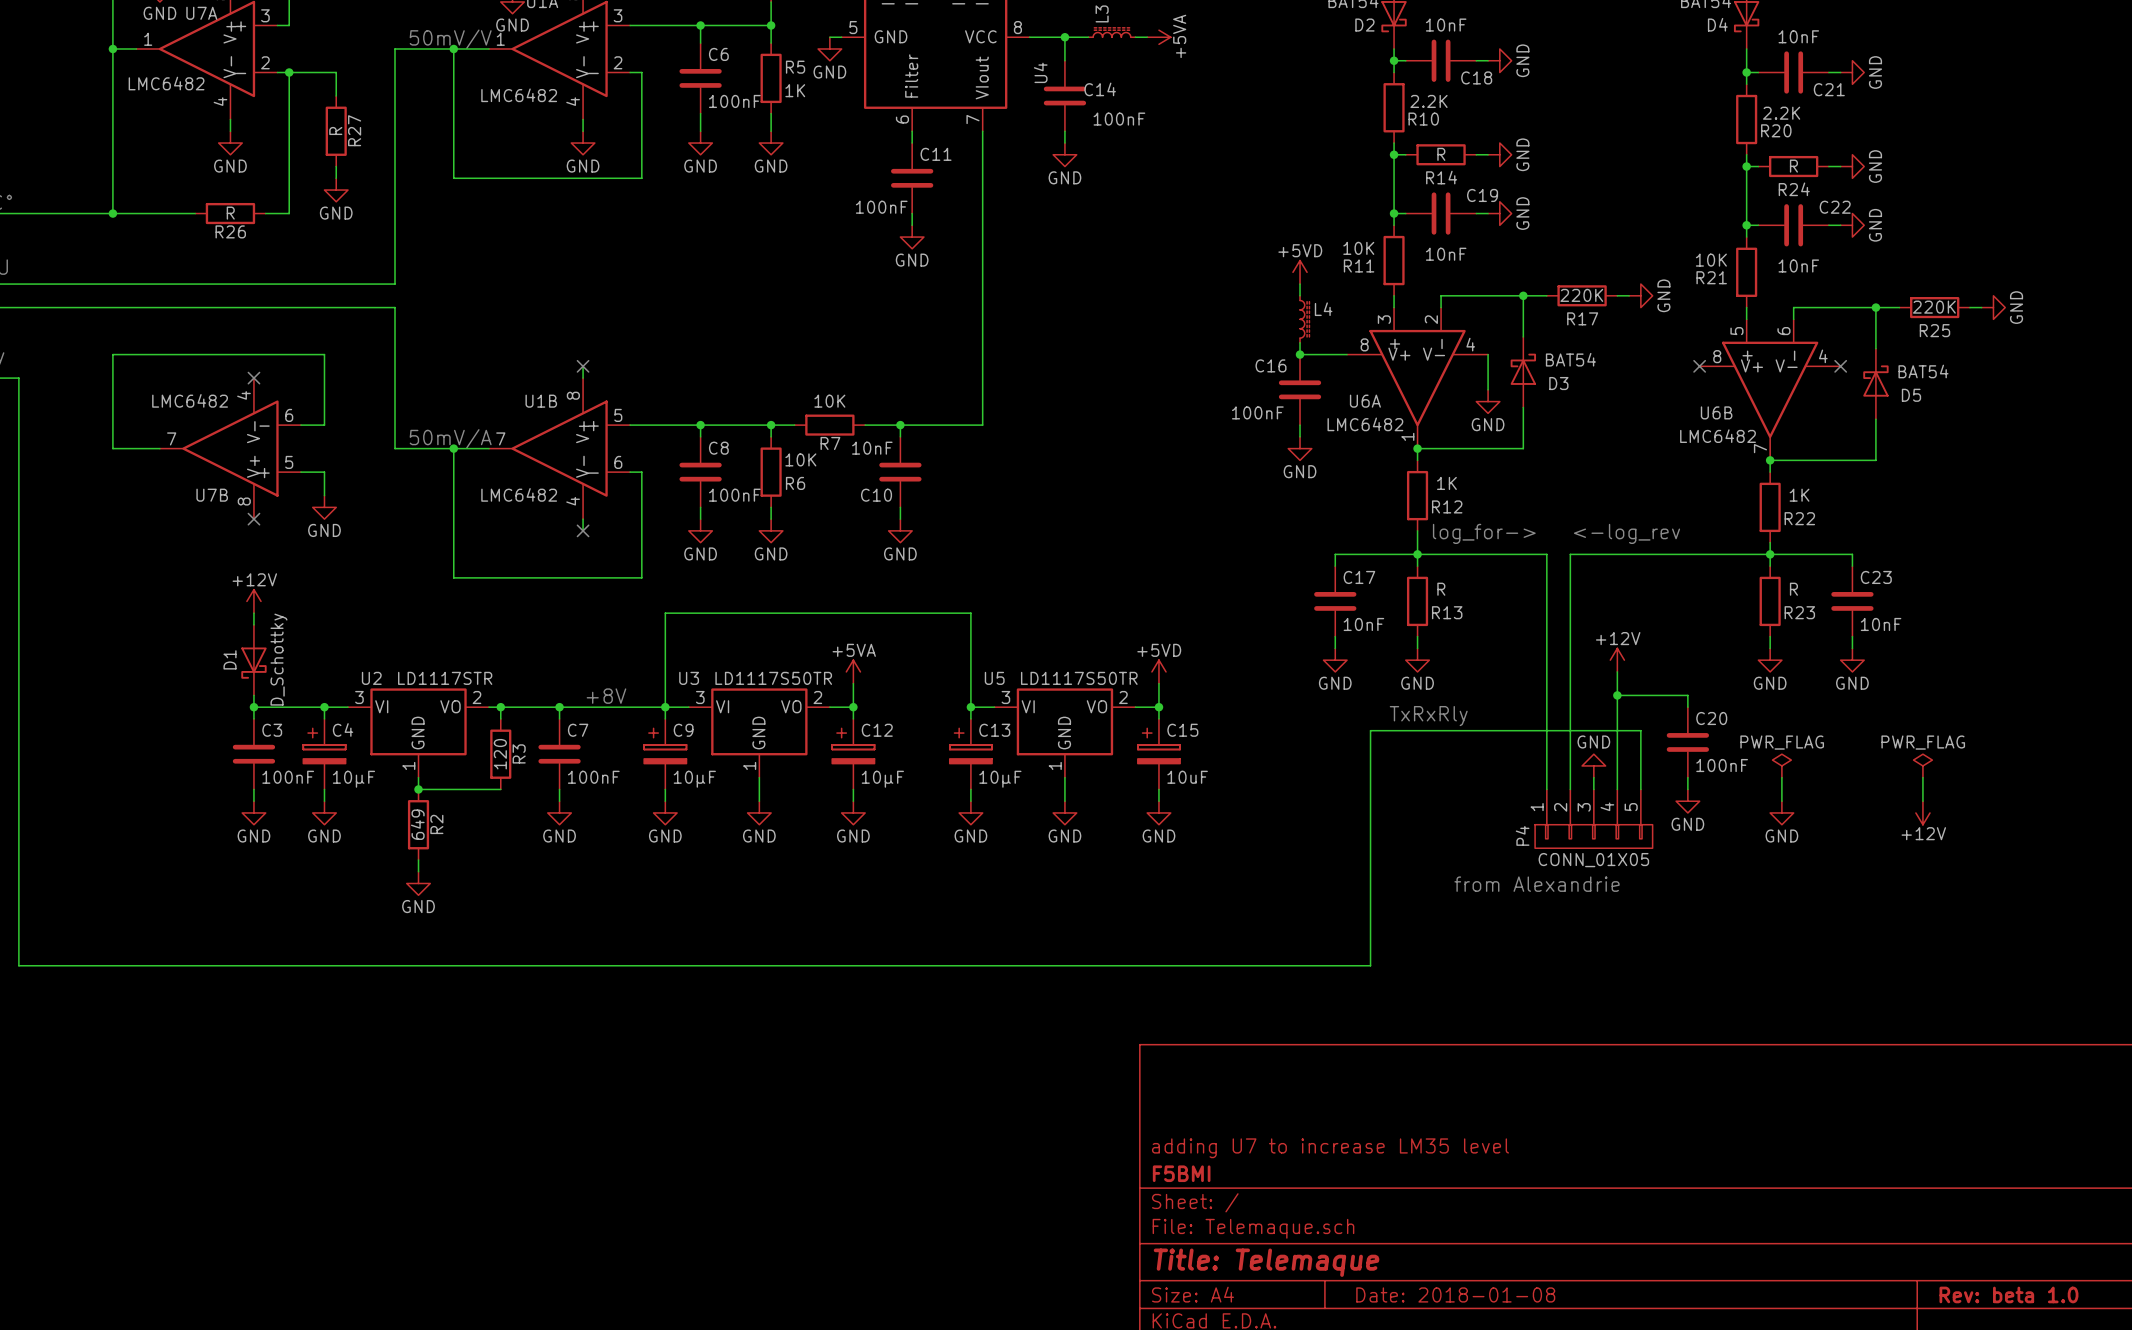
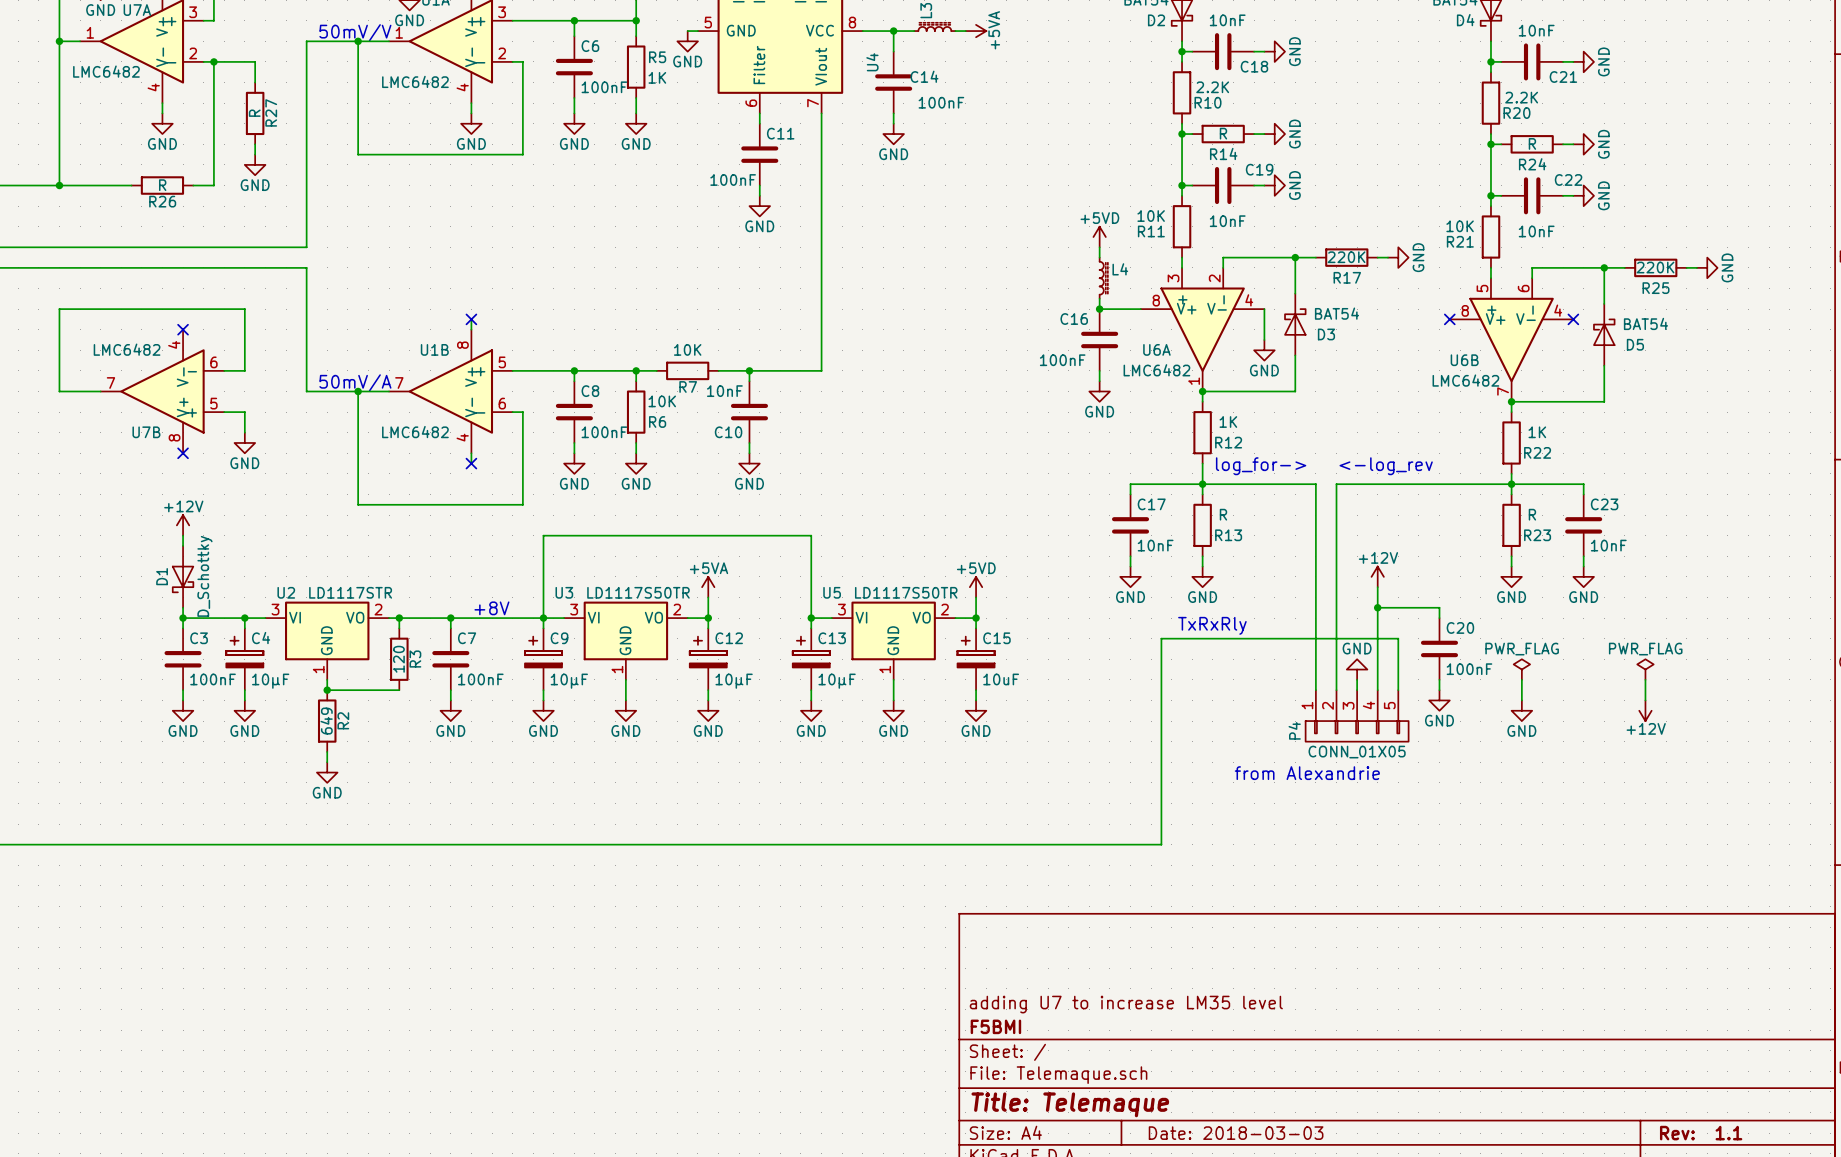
title block: Date: 2018-01-08 (1455, 1294) -> Date: 2018-03-03 (1236, 1133)
title block: Rev: beta 1.0 (2008, 1294) -> Rev: 1.1 (1701, 1133)

